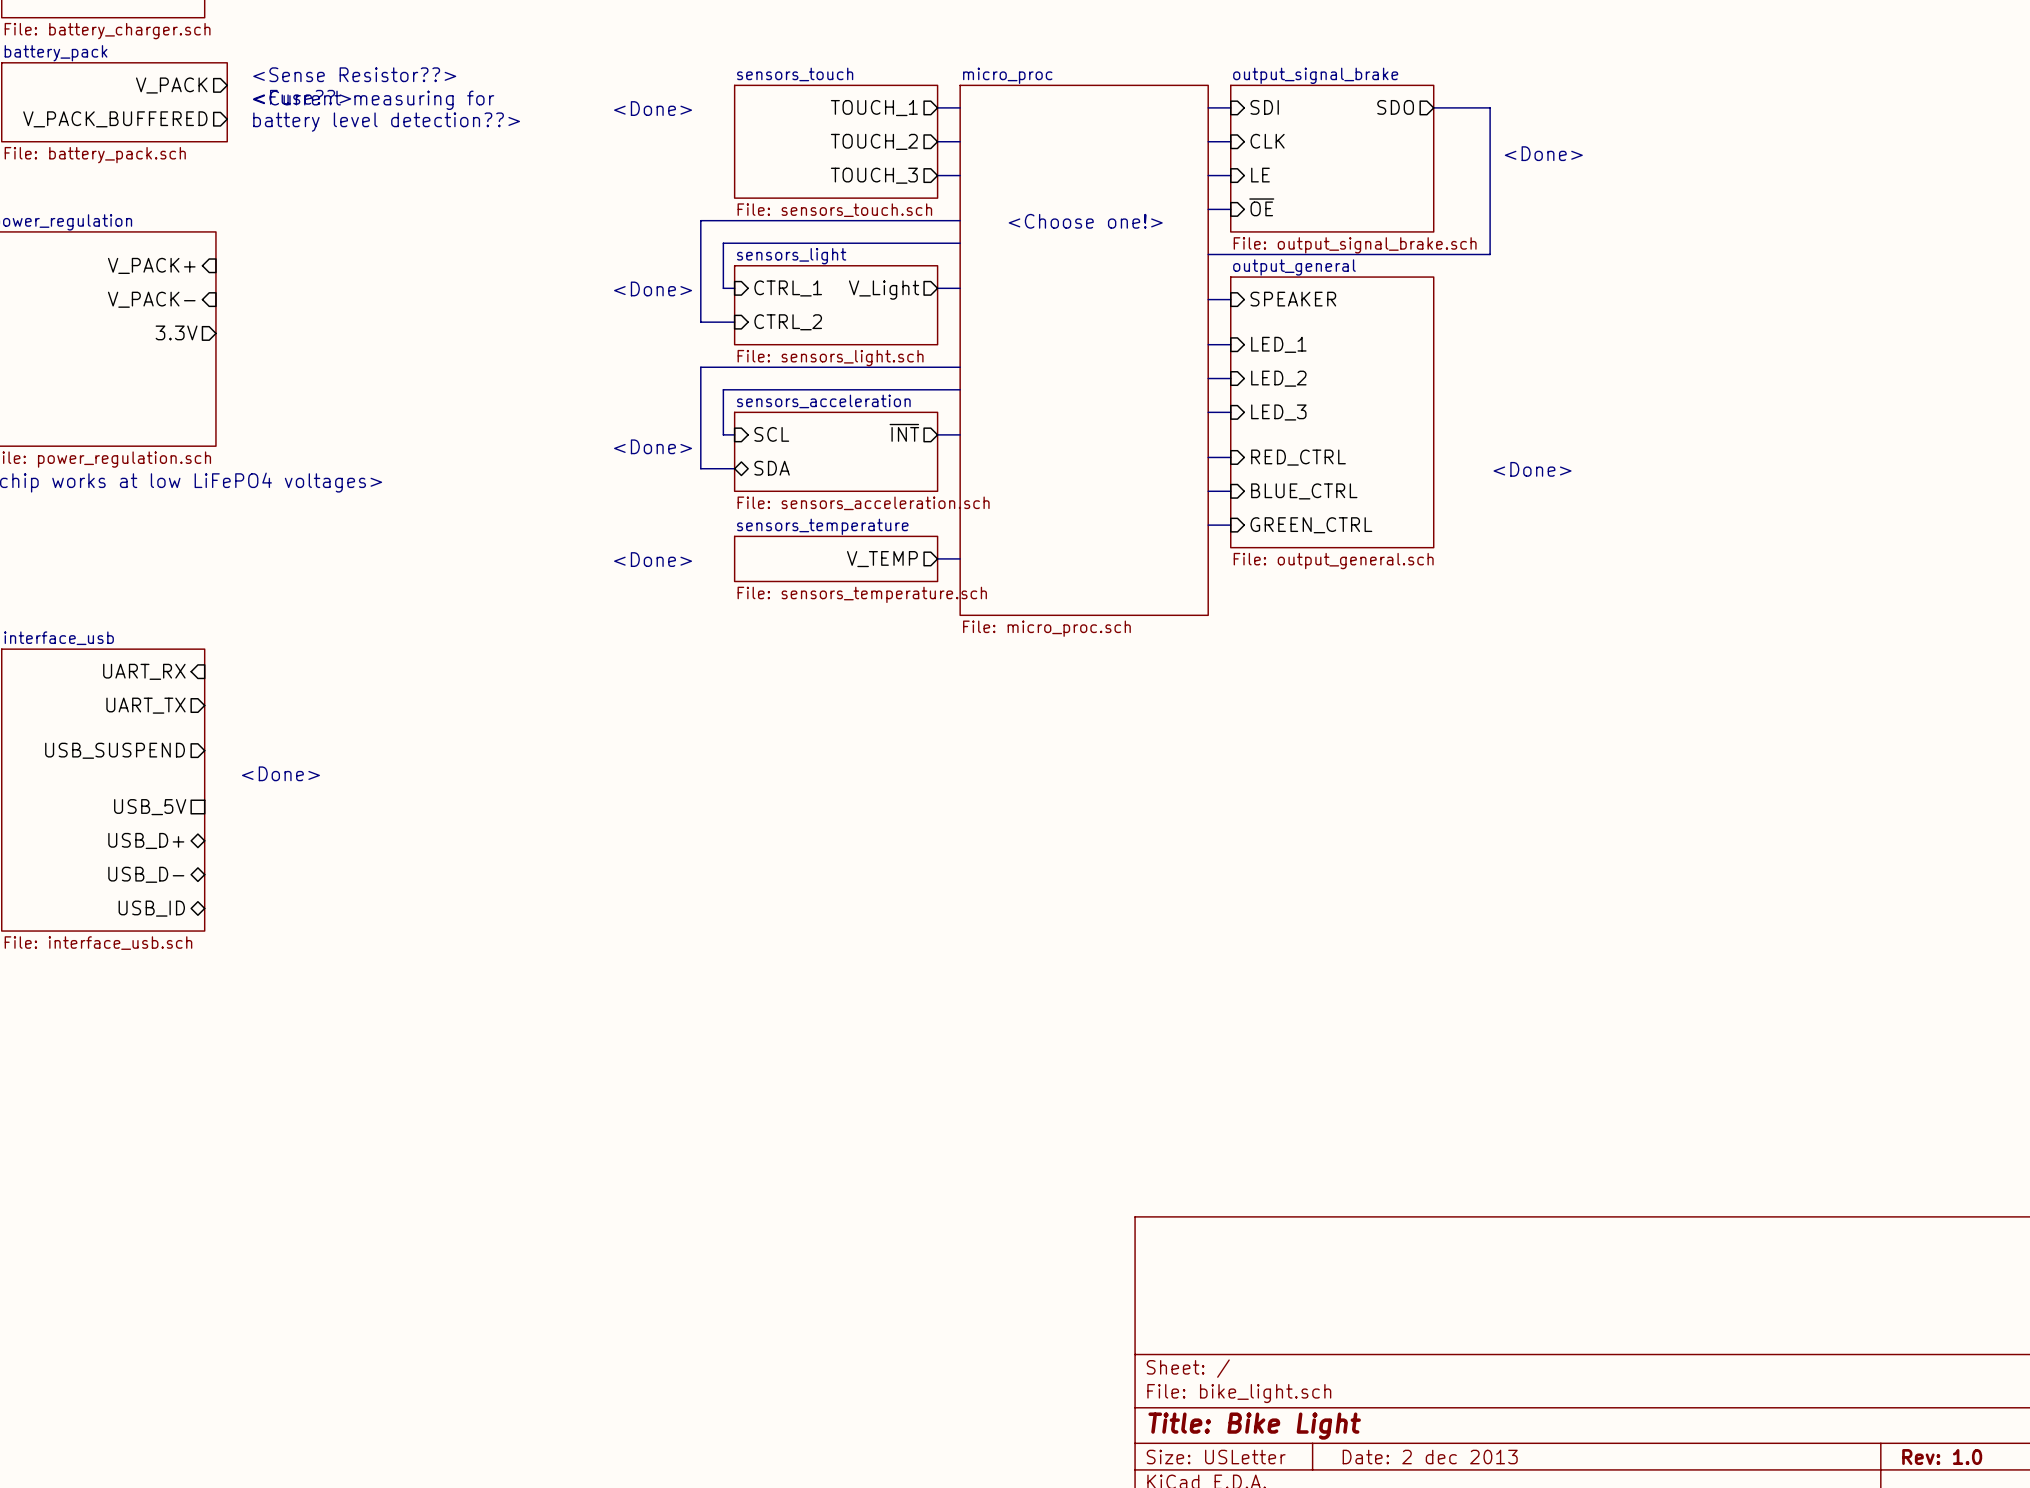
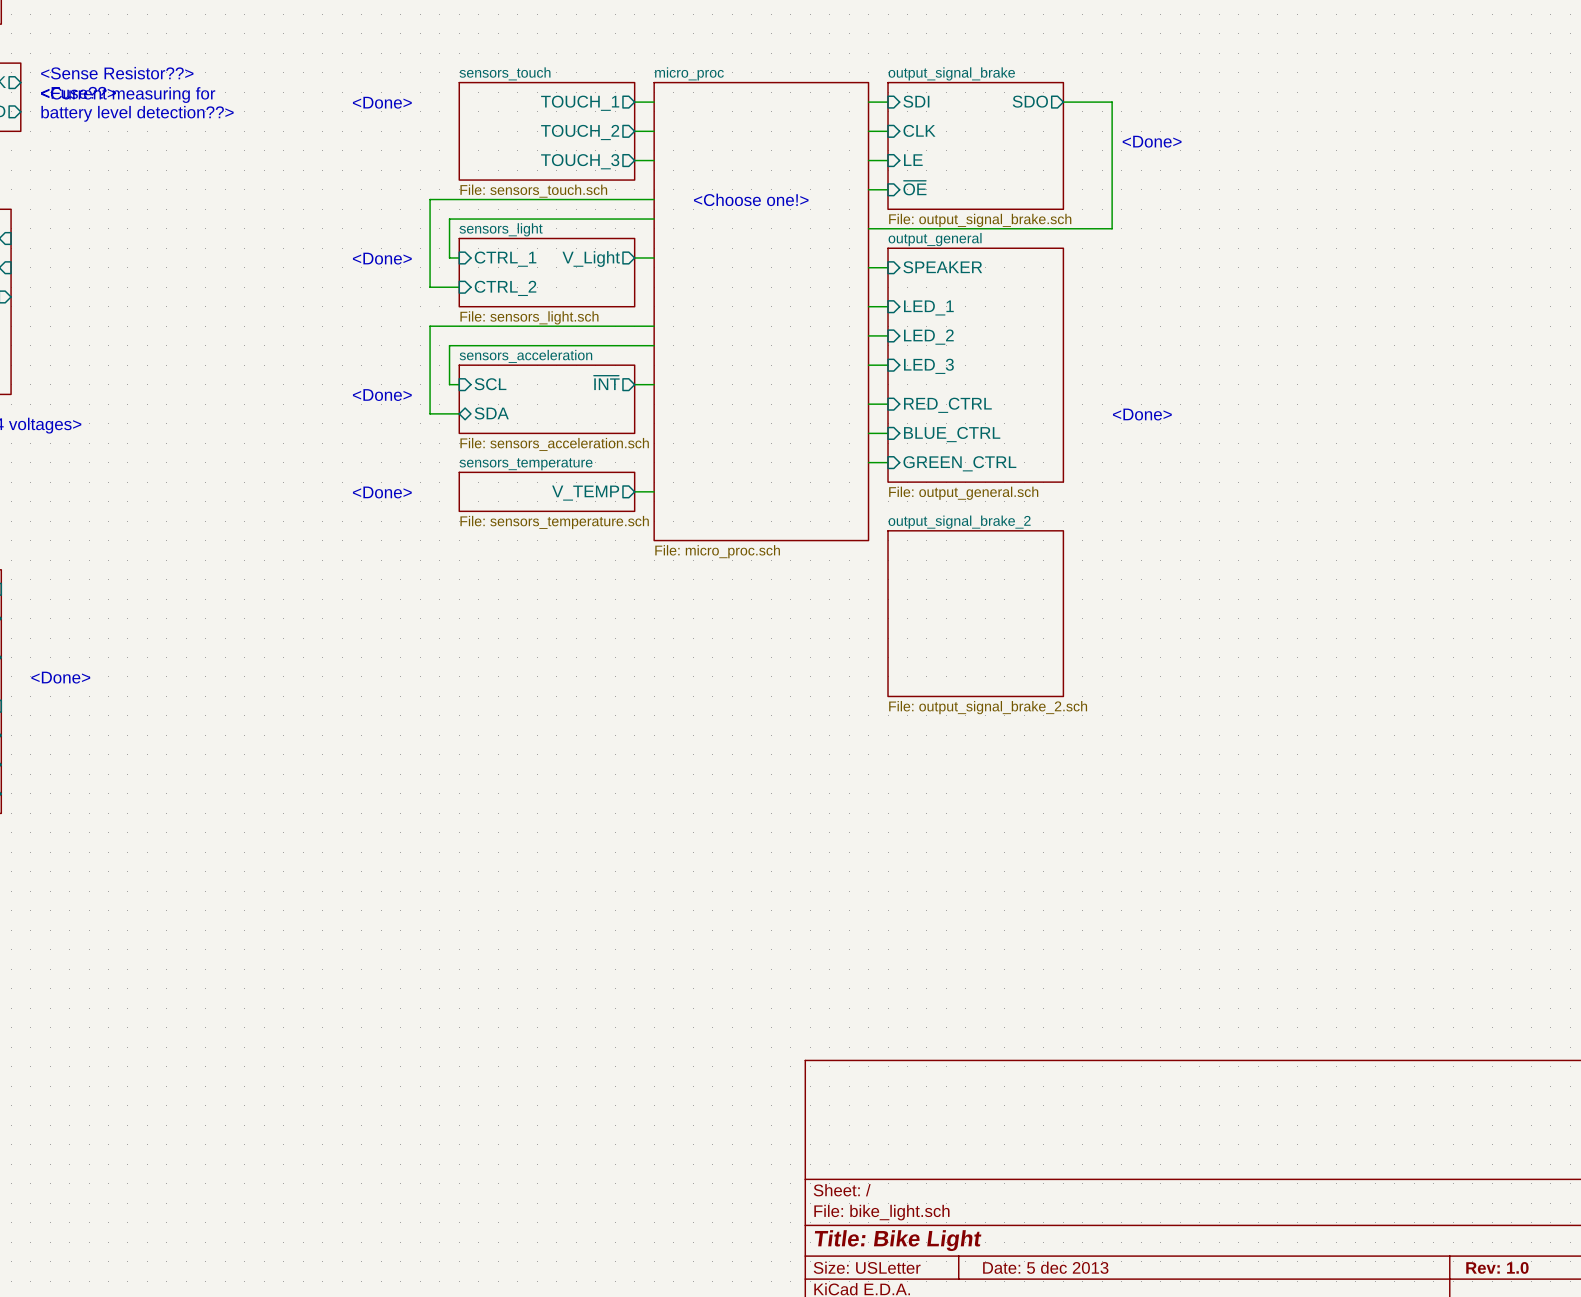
sheet output_signal_brake_2: none -> File: output_signal_brake_2.sch (975, 613)
title block: Date: 2 dec 2013 (1430, 1457) -> Date: 5 dec 2013 (1045, 1267)

